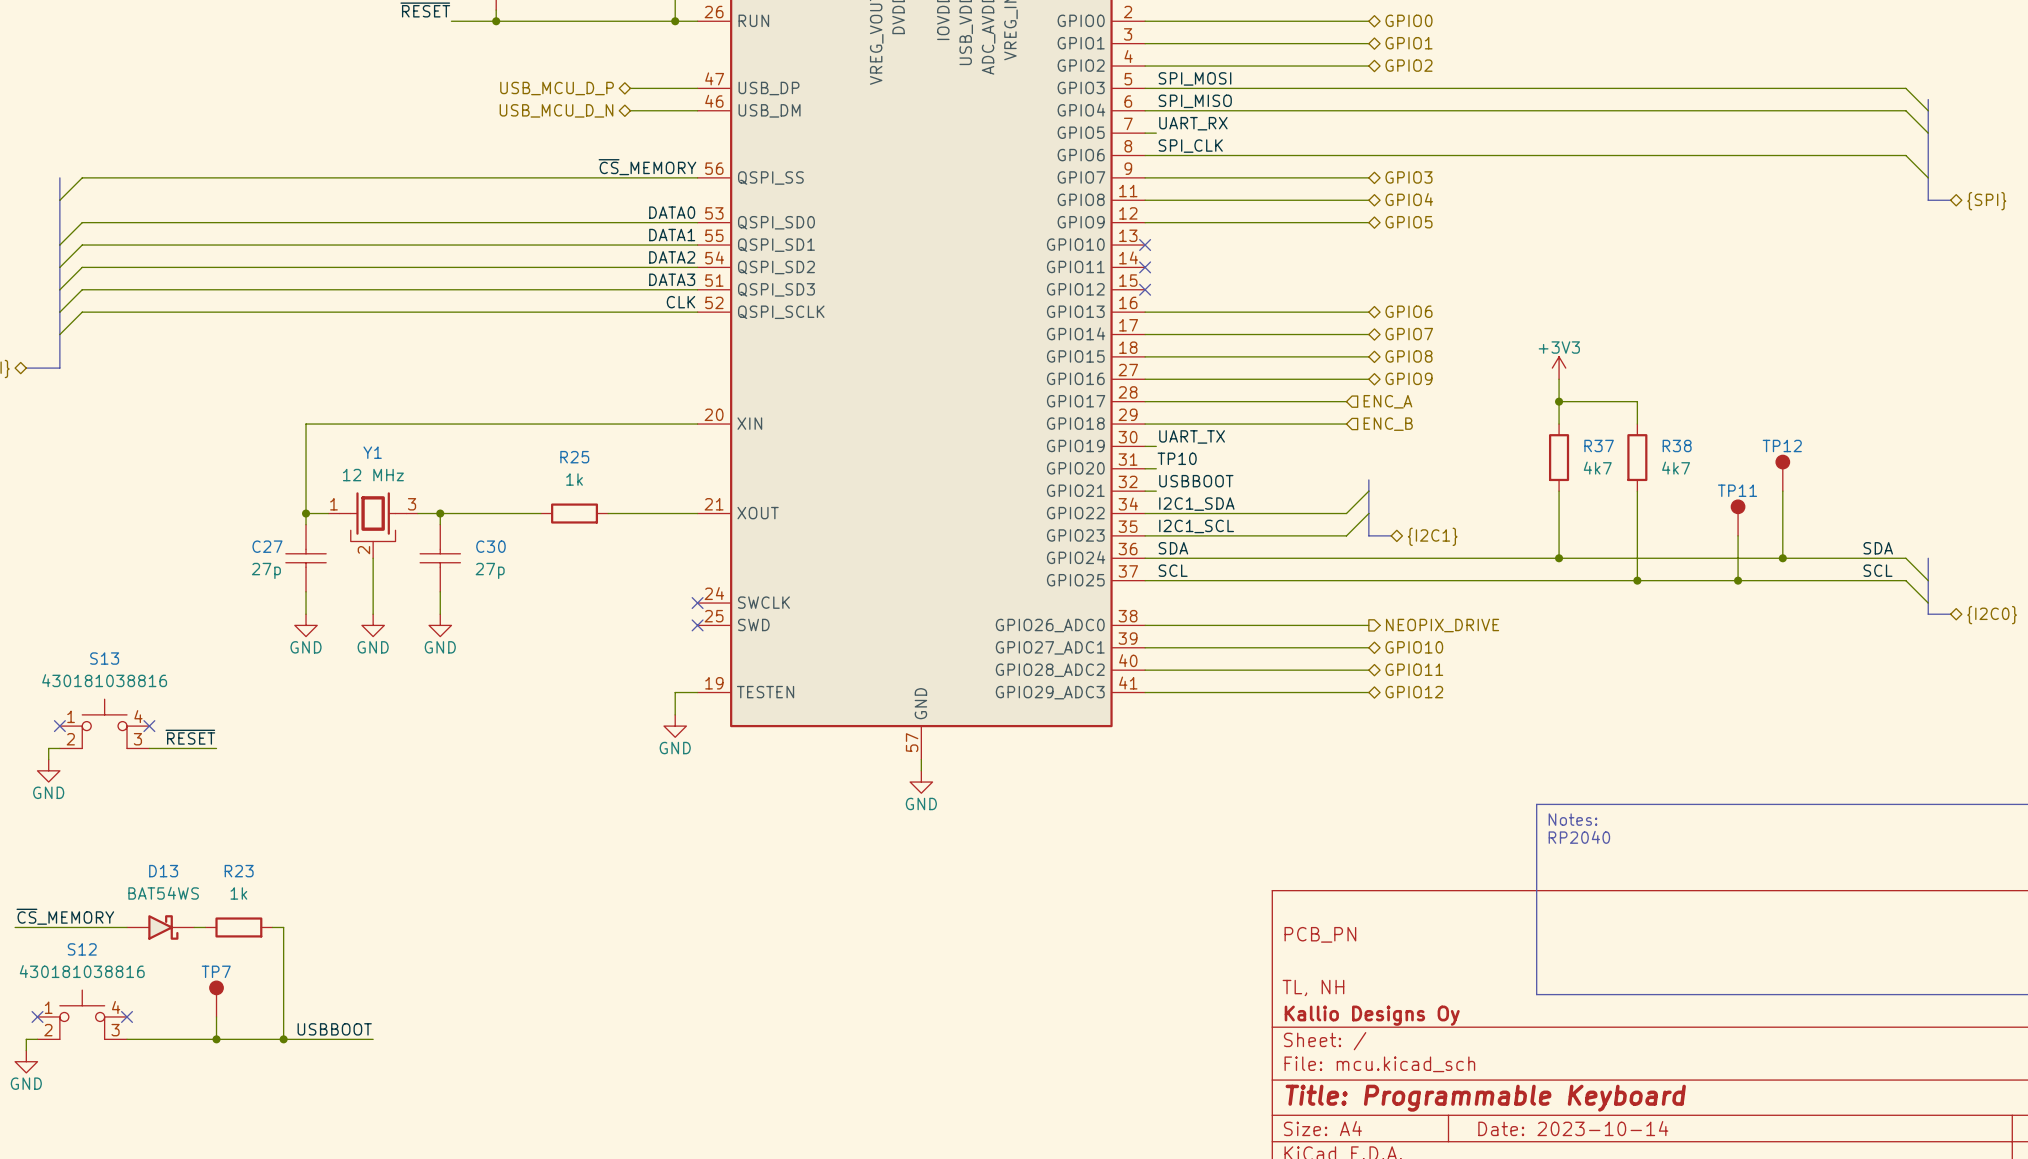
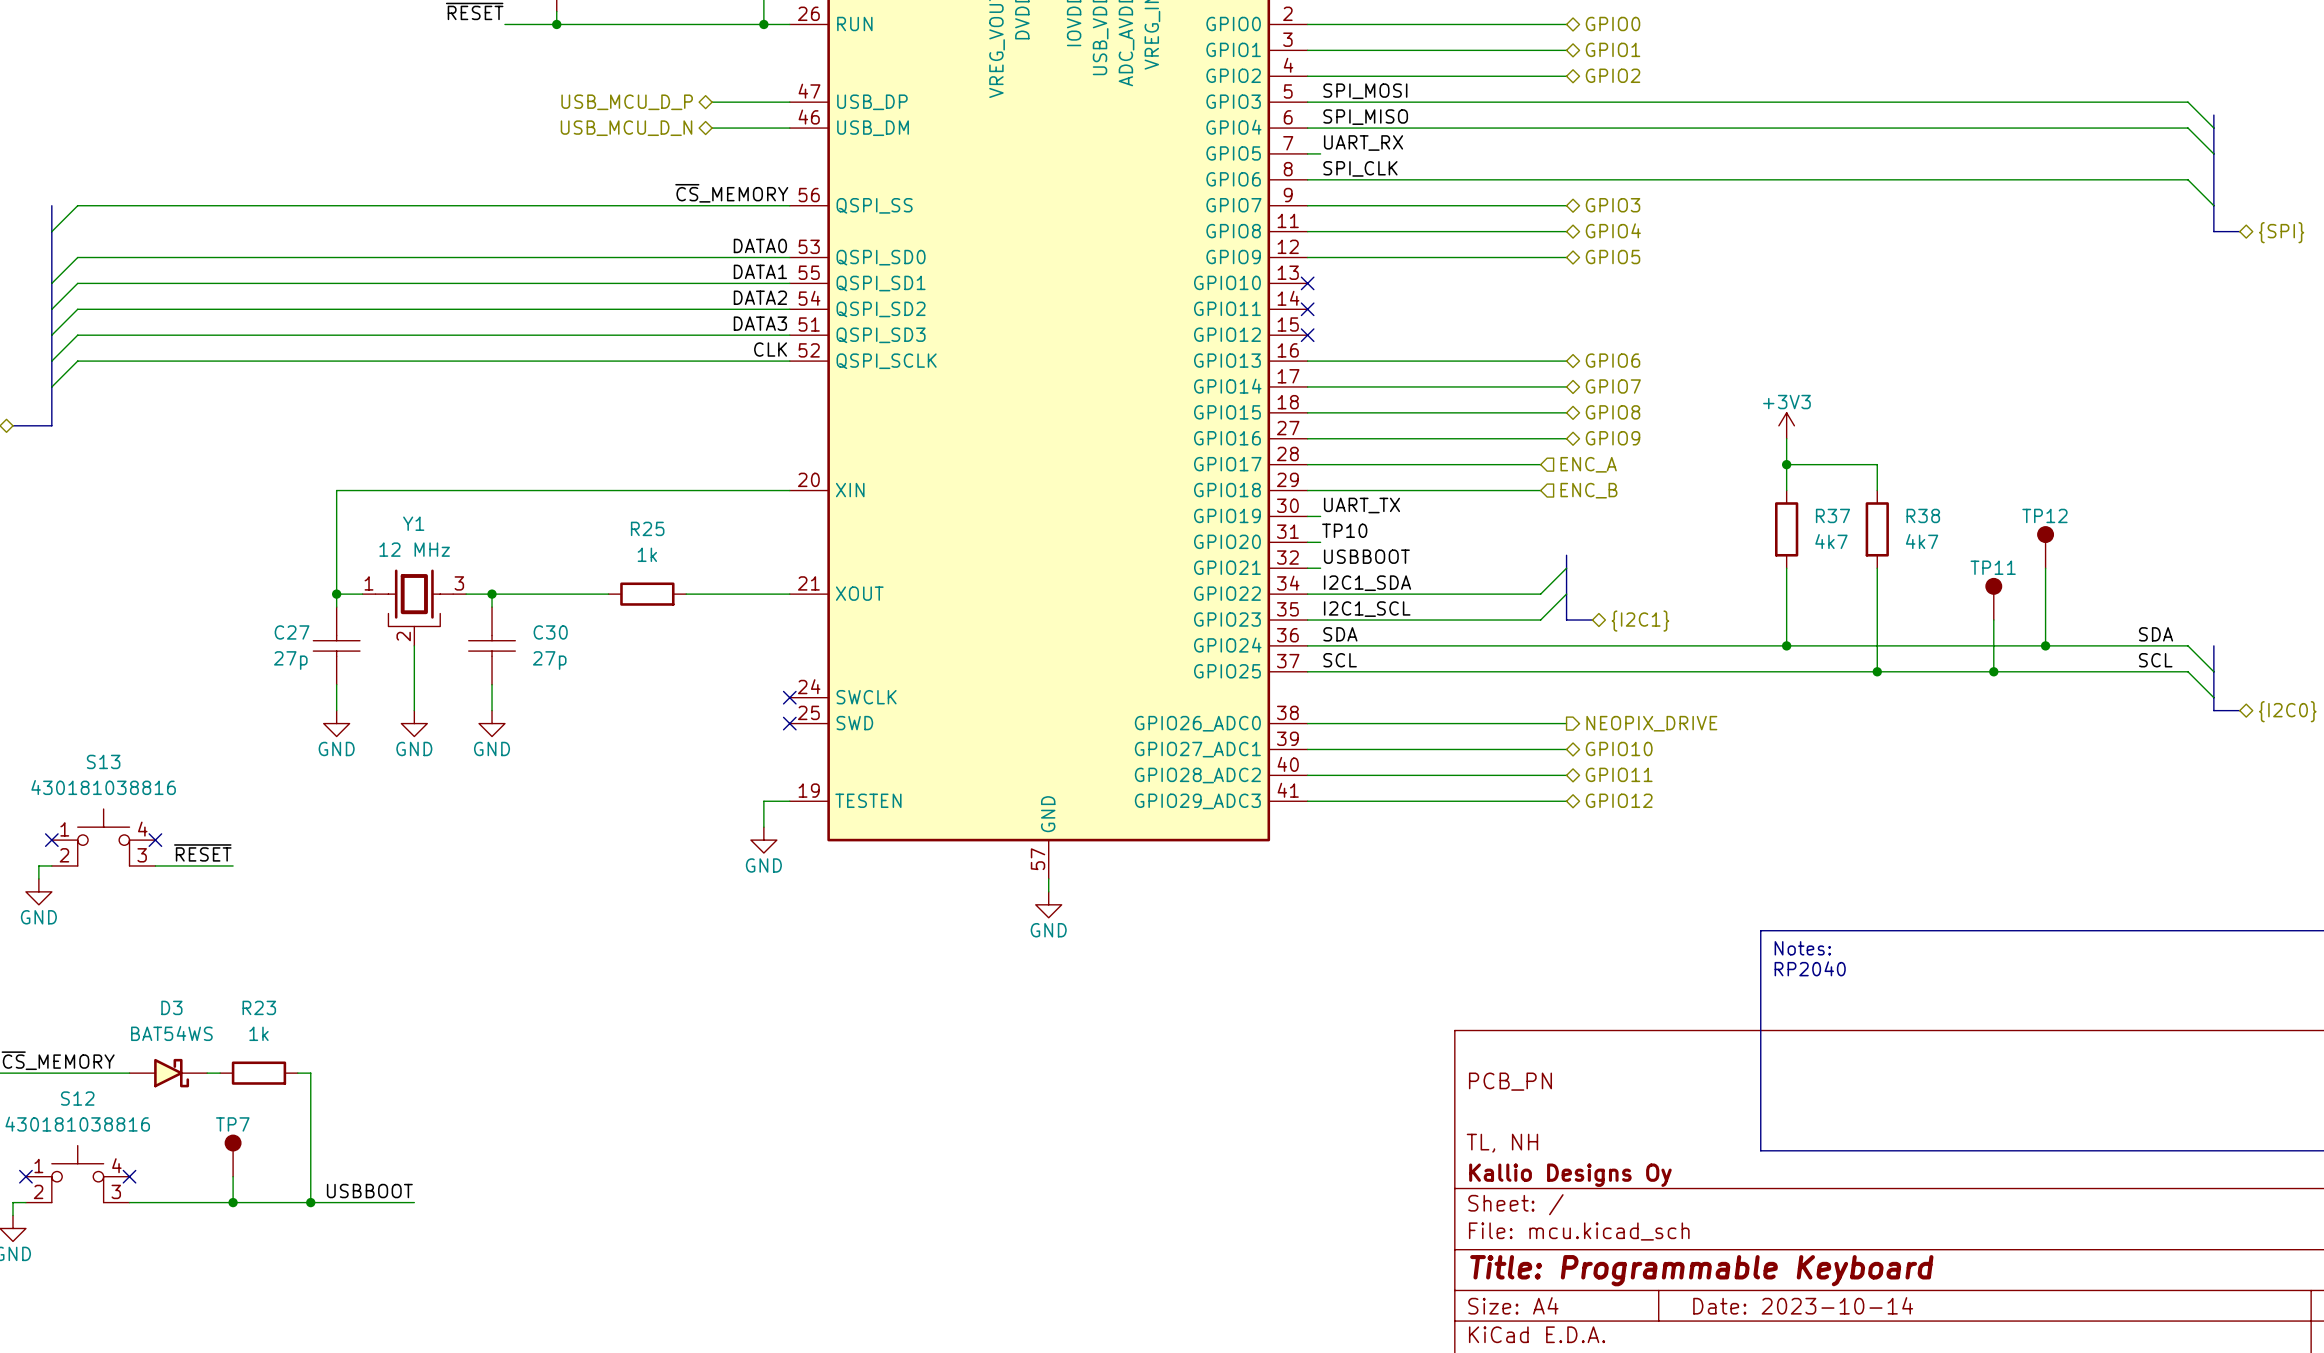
D13 name: D13 (163, 871) -> D3 (171, 1007)

